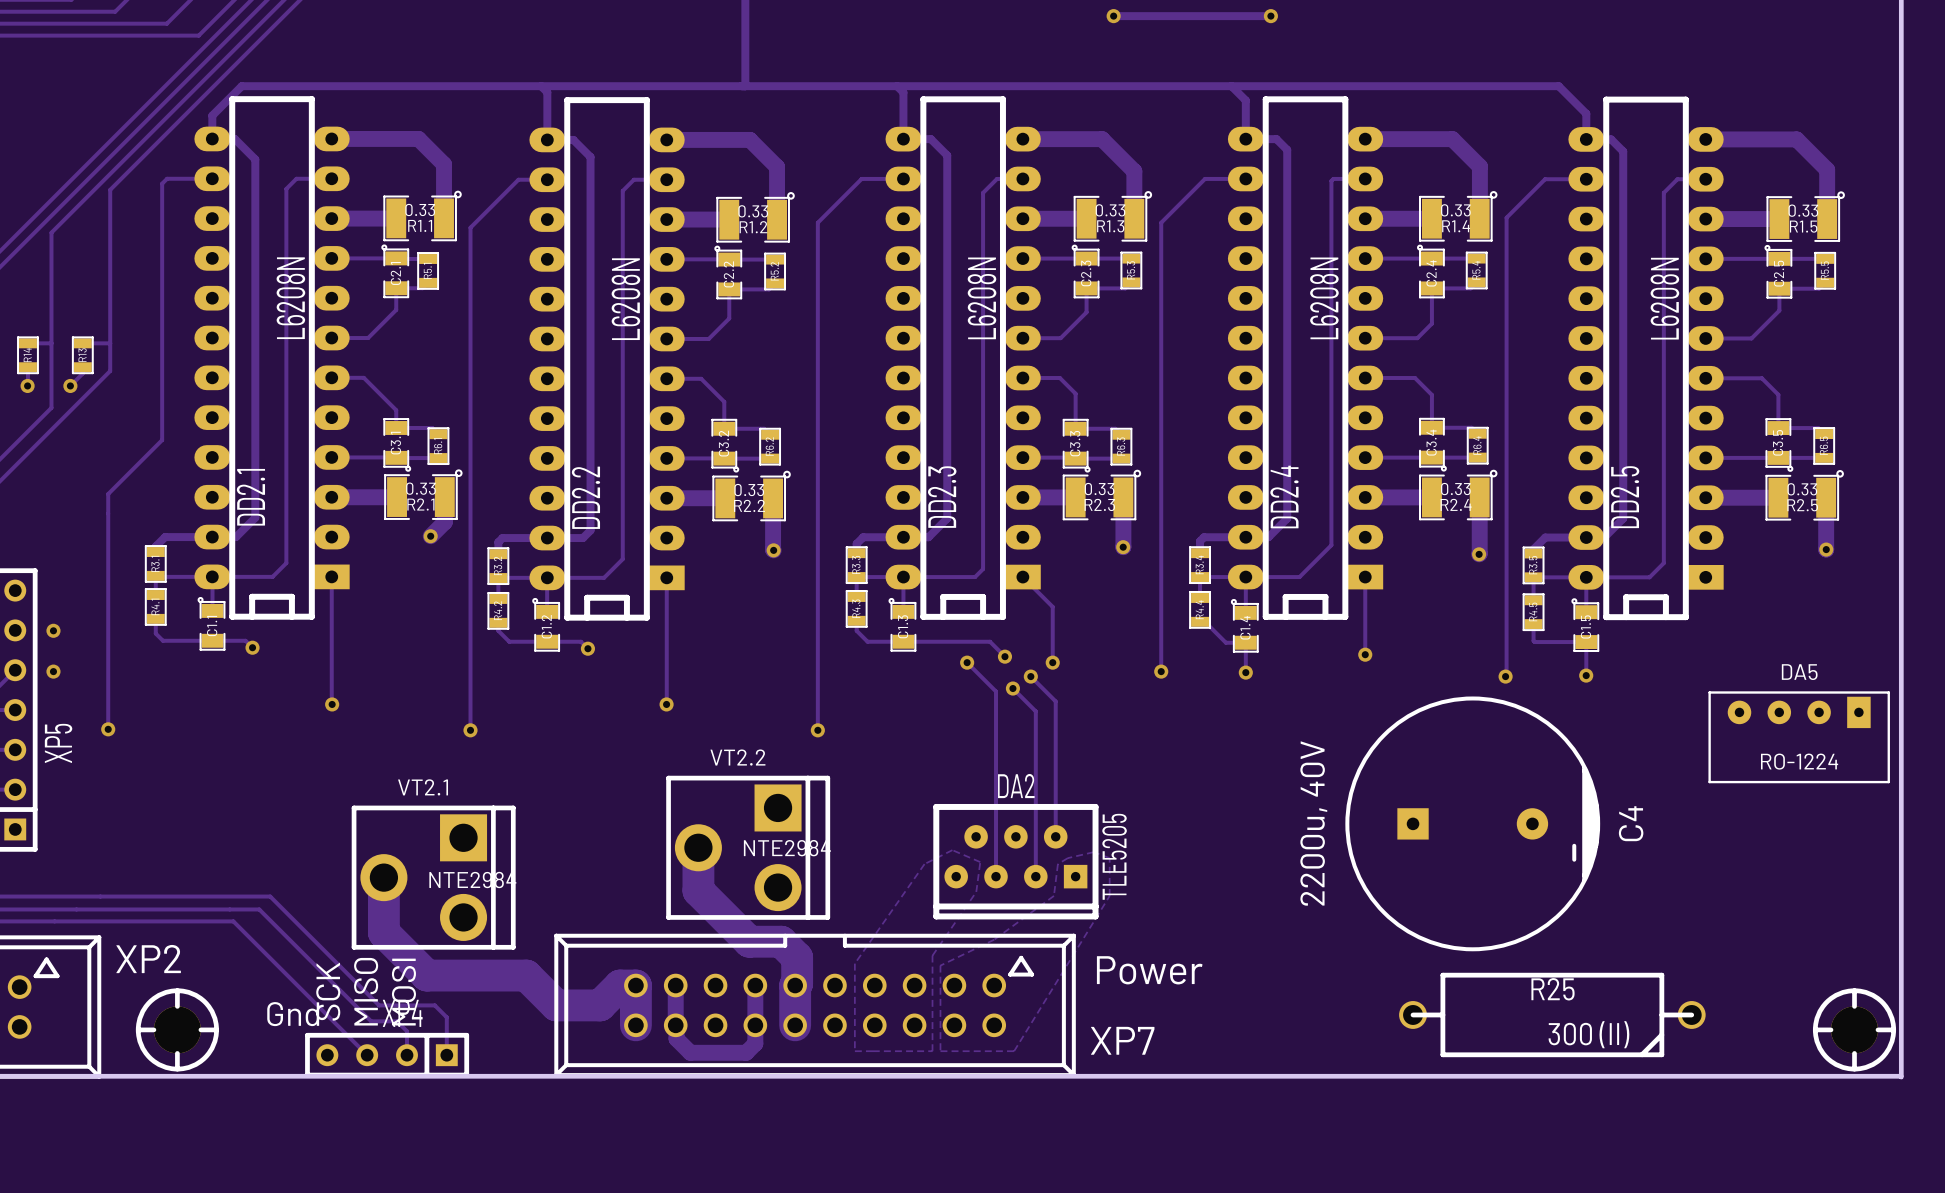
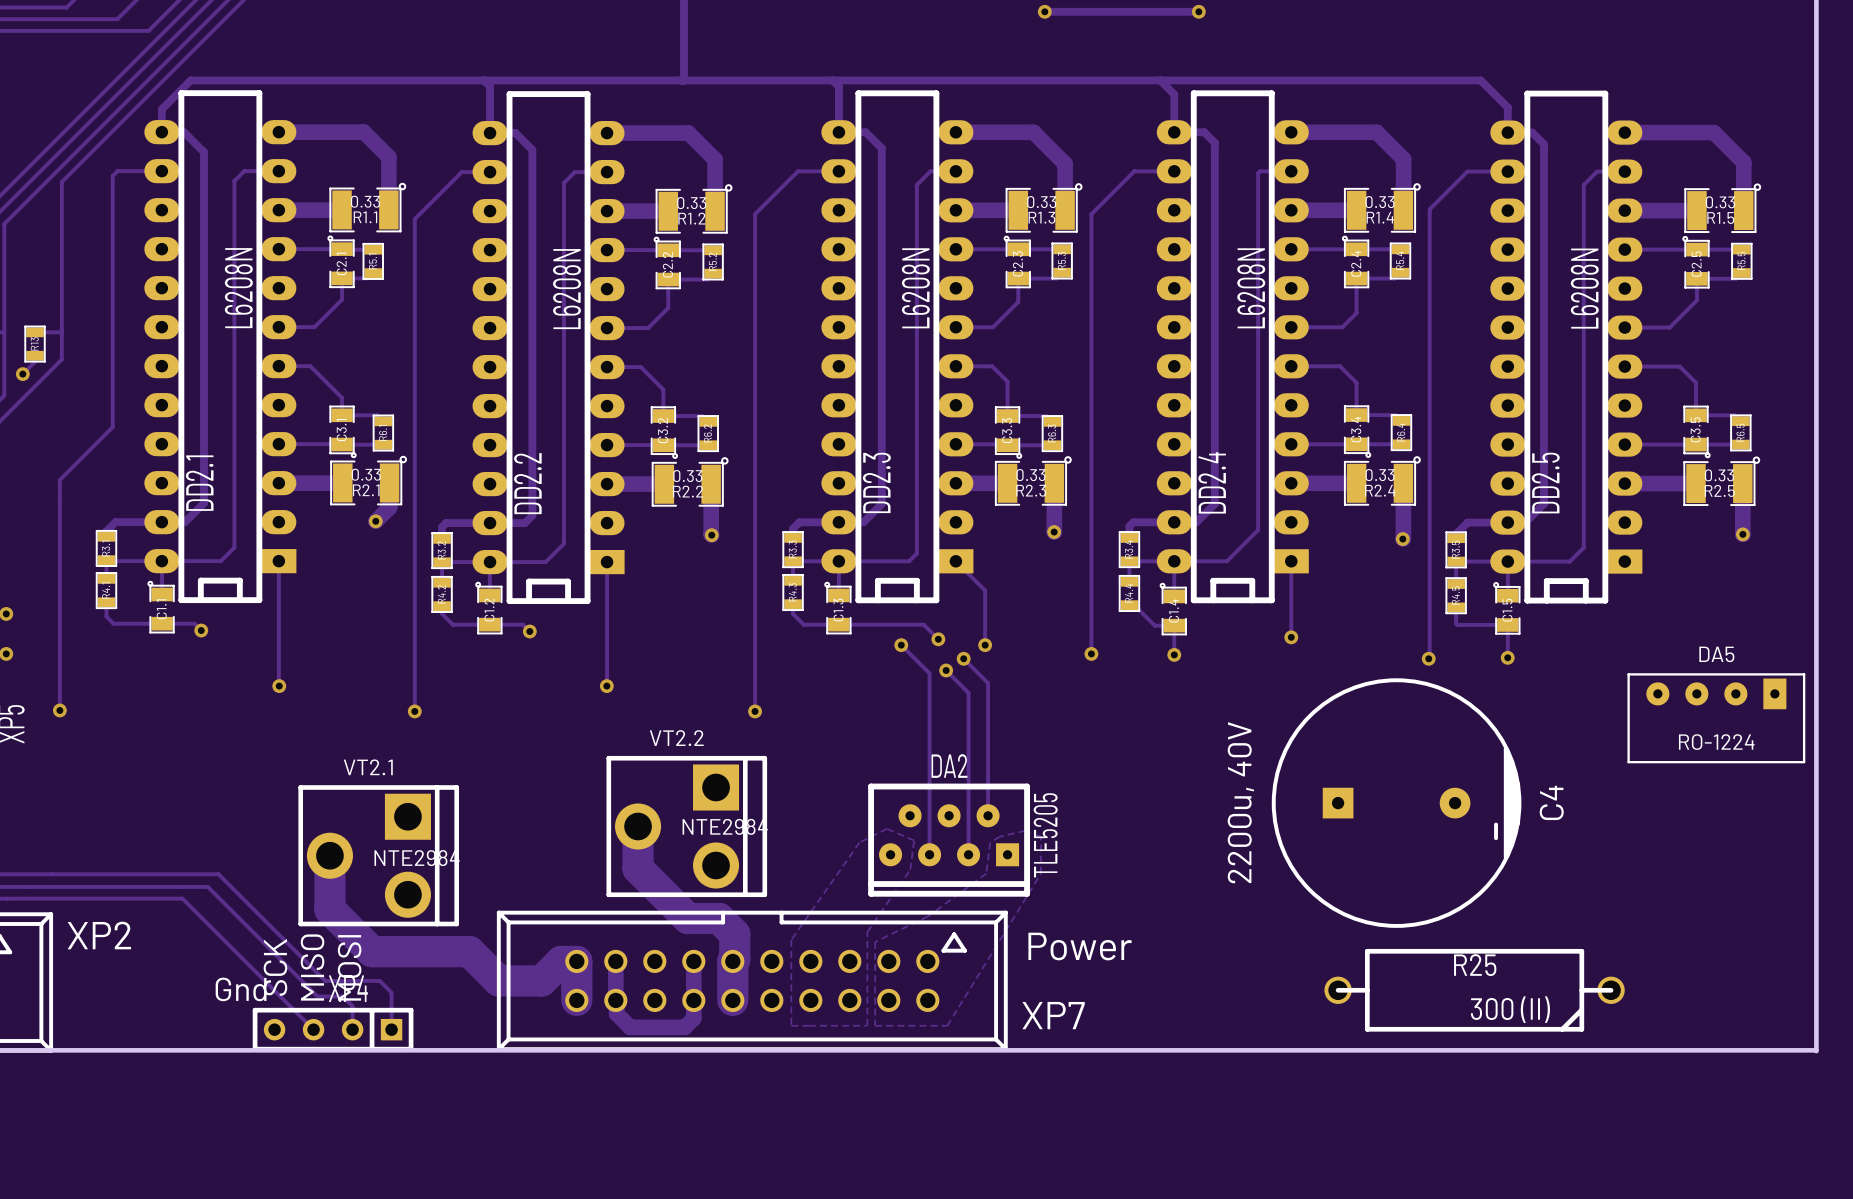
part: (177, 1029) -> none
part: (1854, 1029) -> none

